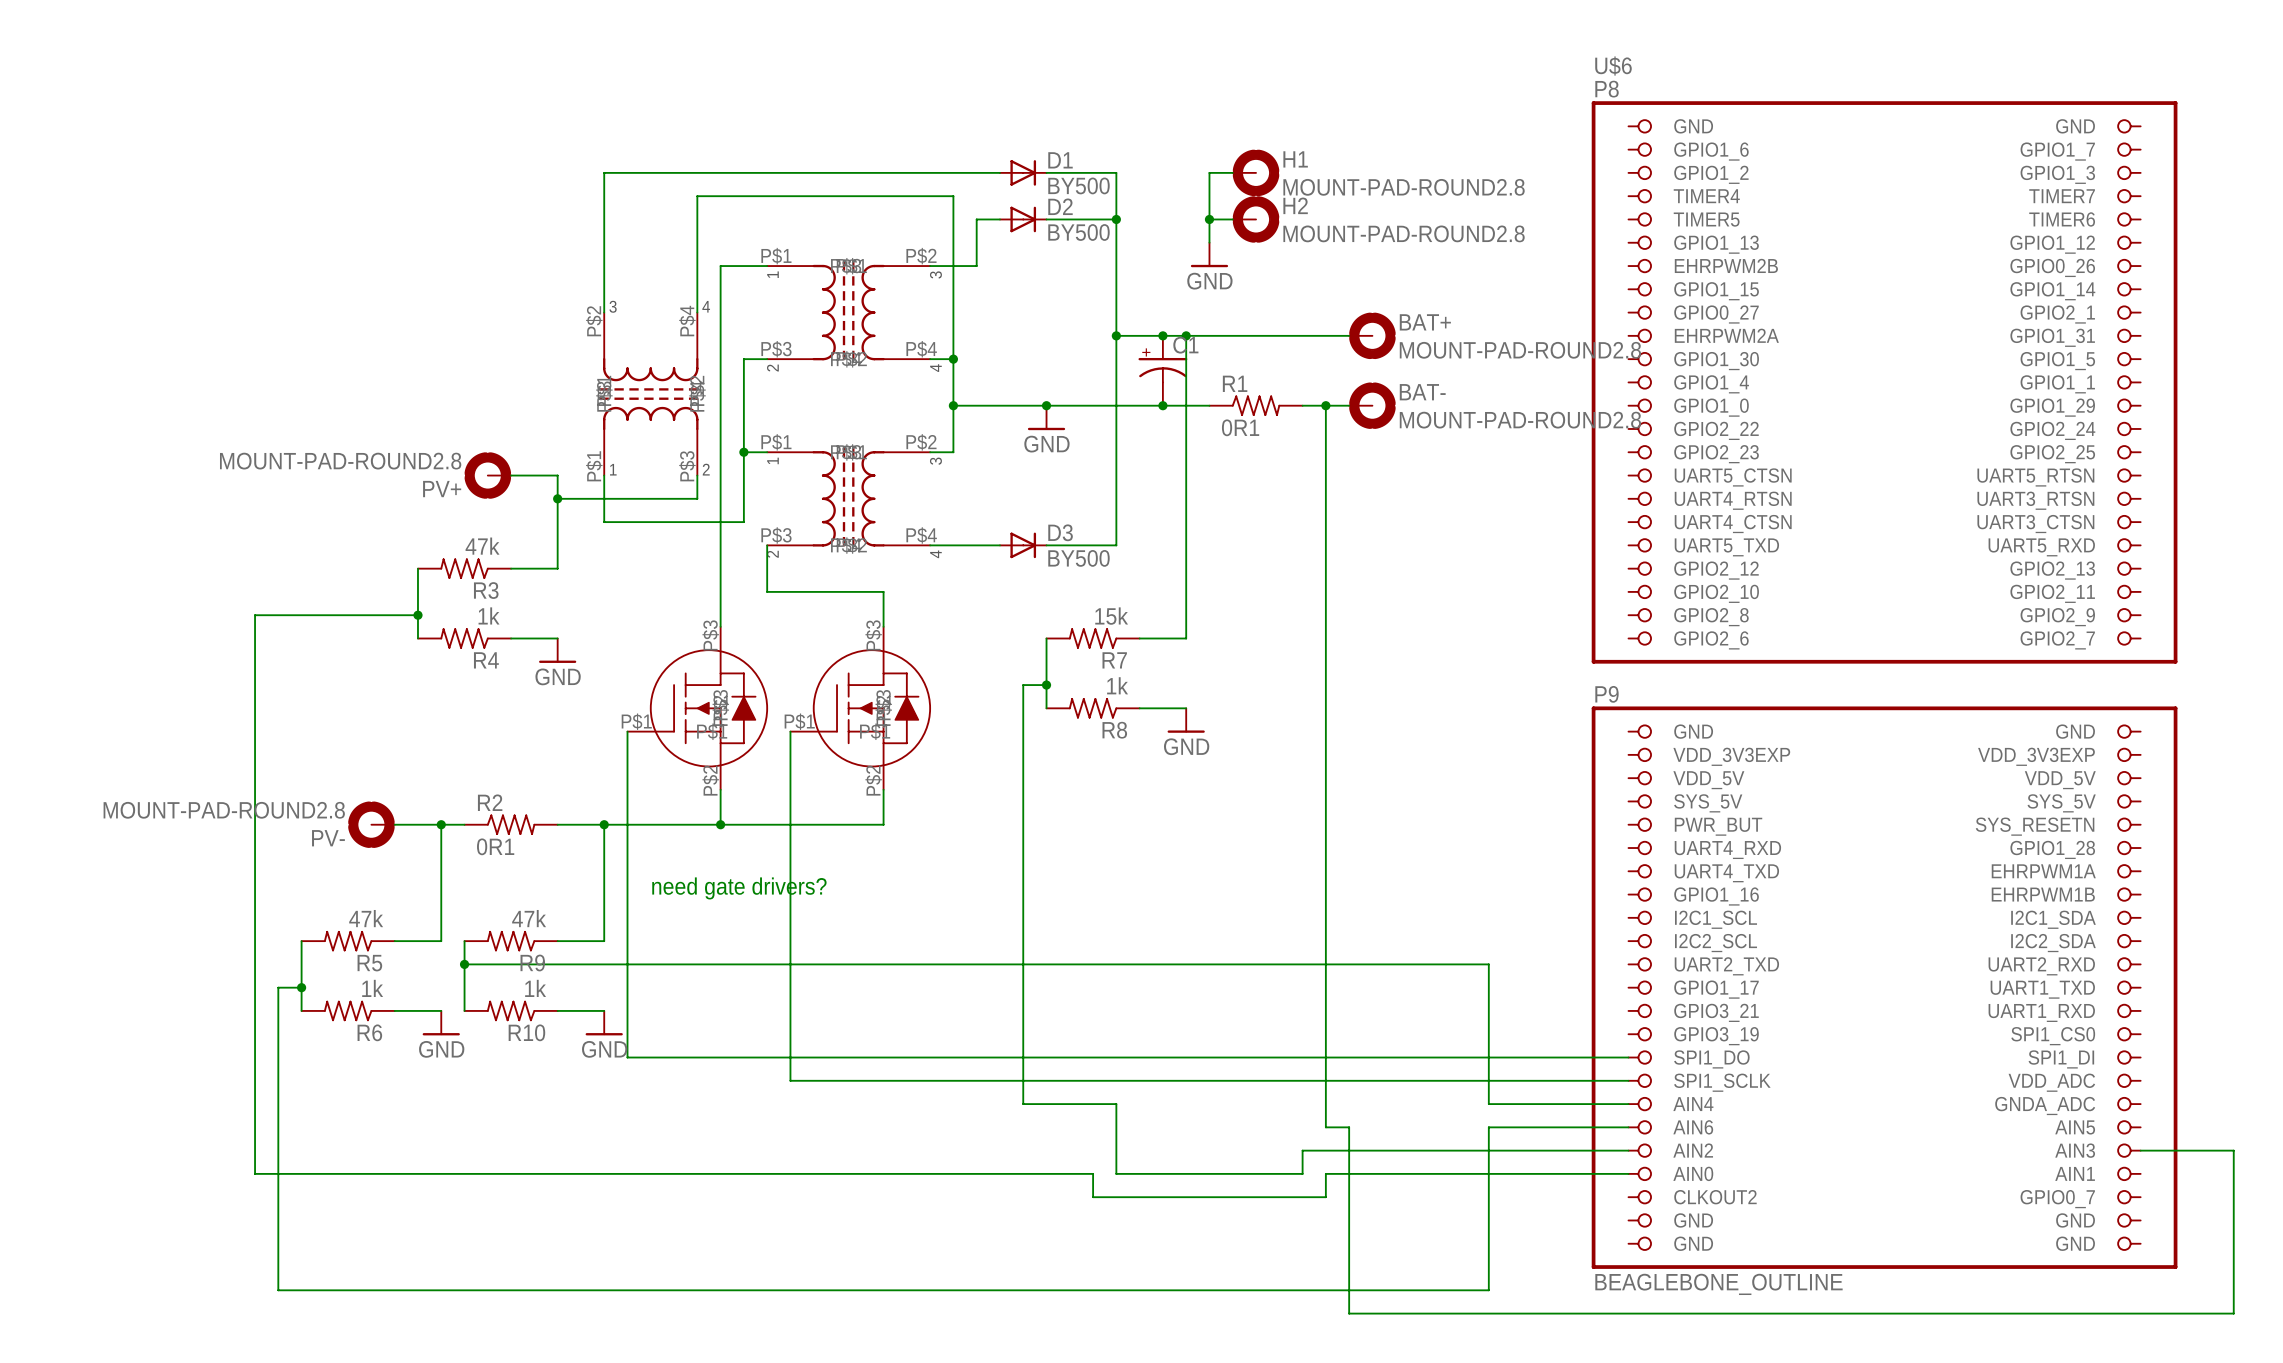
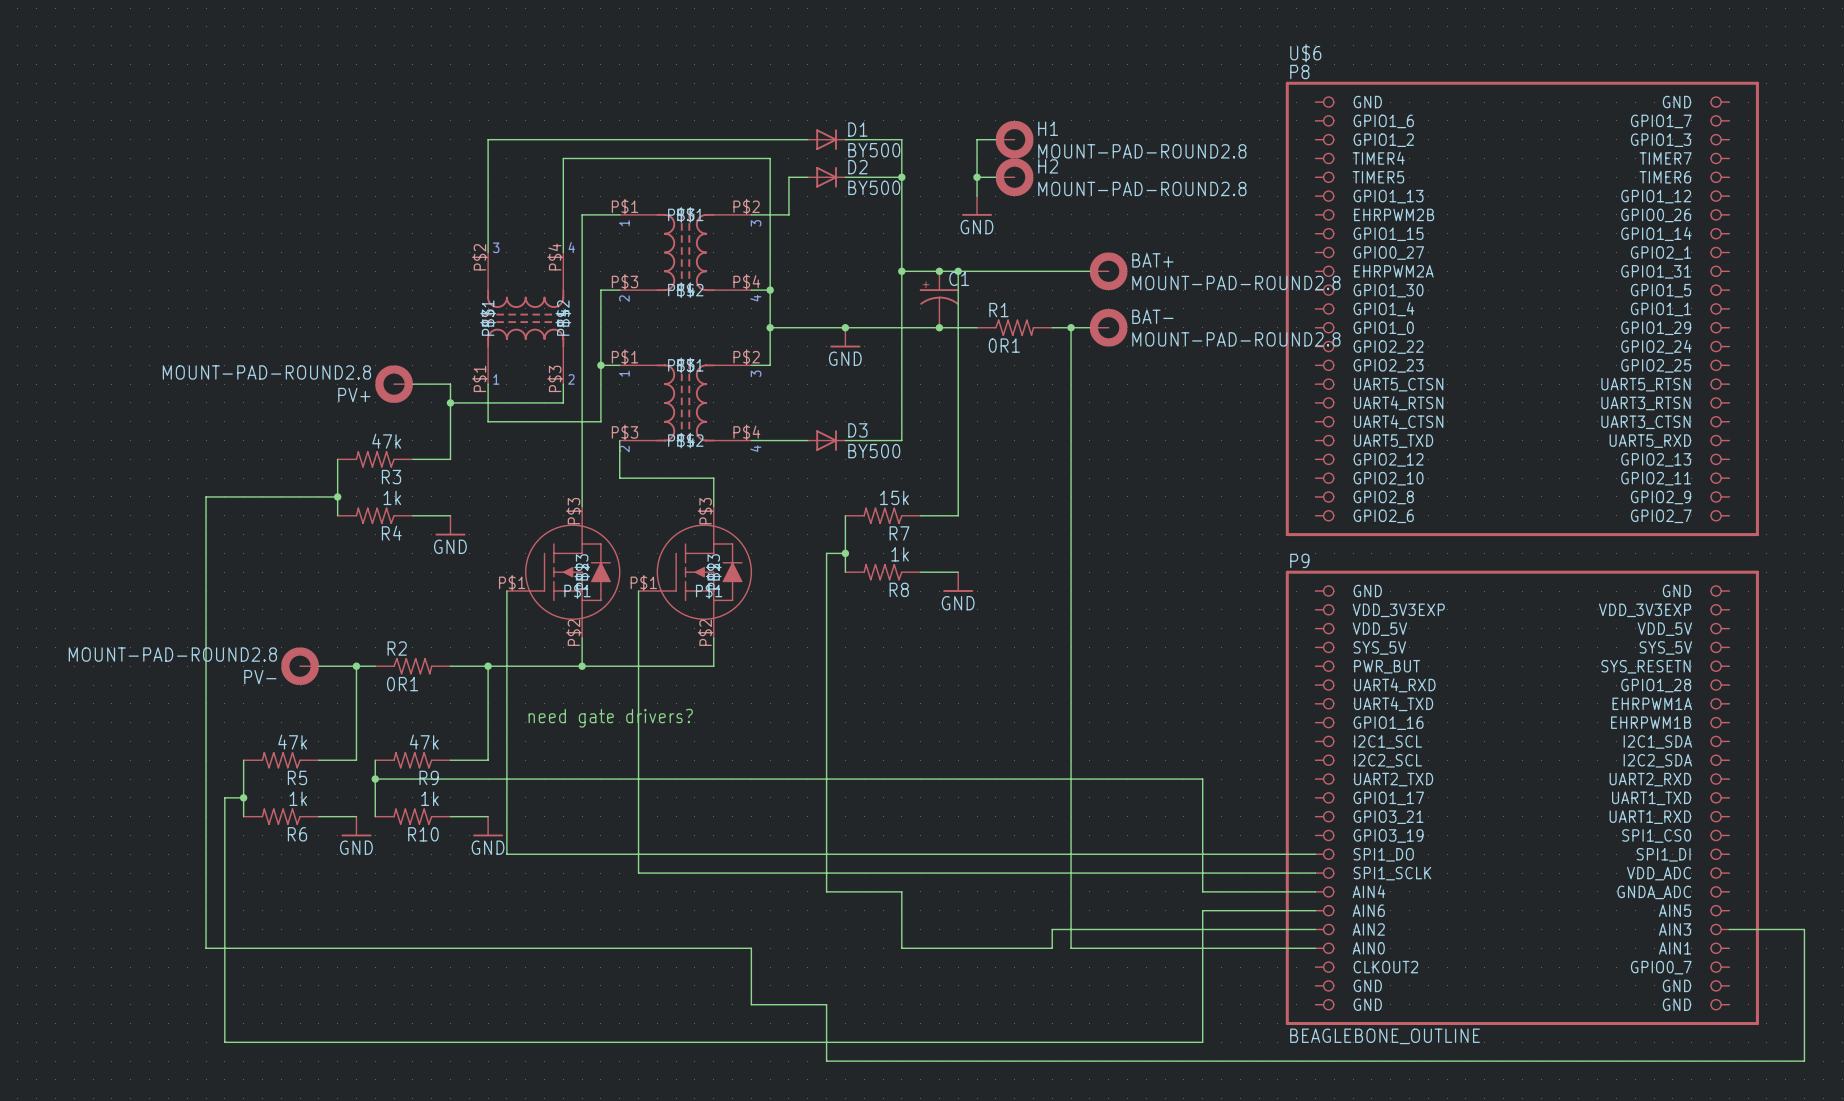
wire: (1325, 1127) (1349, 1127) (1349, 1313) -> (1071, 910) (1071, 948)
wire: (930, 1173) (1093, 1173) (1093, 1197) (1325, 1197) (1325, 1173) -> (751, 948) (751, 1004) (826, 1004) (826, 1061) (1089, 1061)

